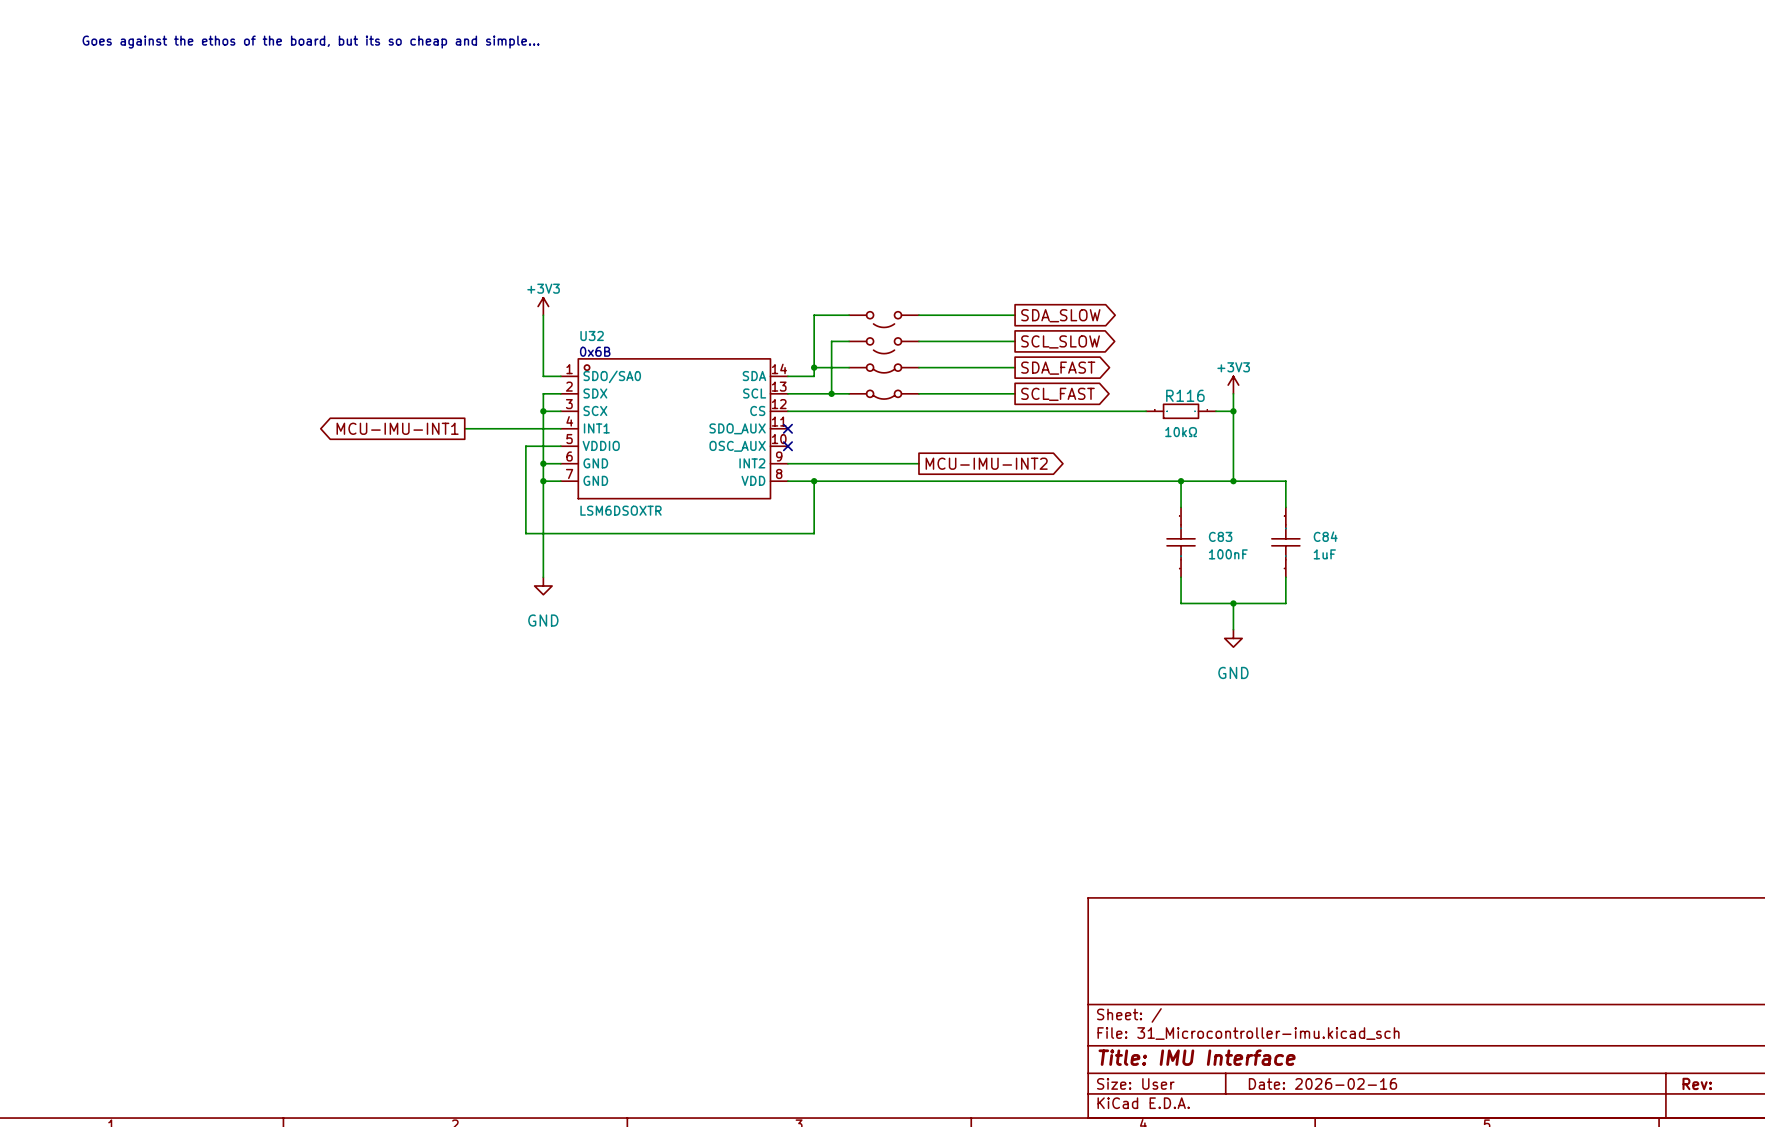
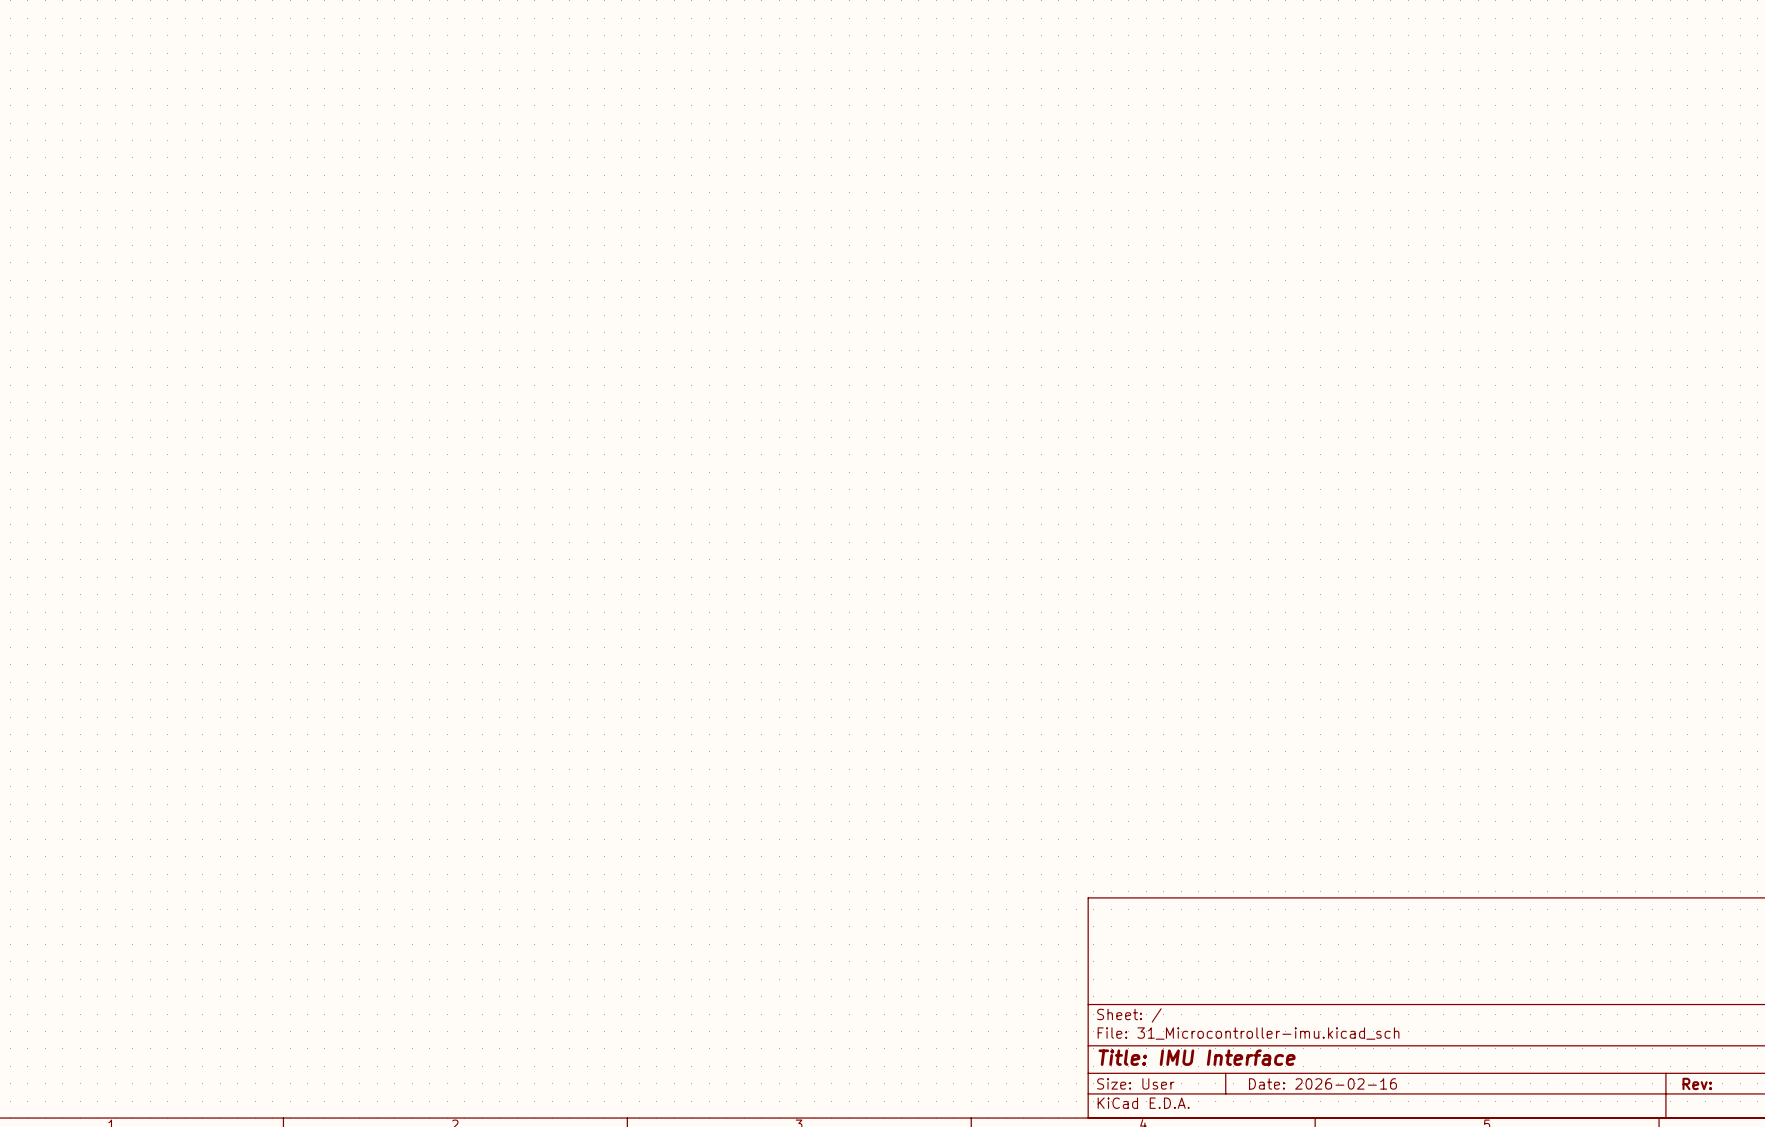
text: Goes against the ethos of the board, but its so cheap and simple... (311, 42) -> none
power symbol: +3V3 (543, 306) -> none
wire: (543, 315) (543, 376) (560, 376) -> none
wire: (849, 315) (814, 315) (814, 376) (787, 376) -> none
wire: (918, 315) (1015, 315) -> none
global label: SDA_SLOW (1060, 315) -> none
part: (884, 319) -> none
wire: (849, 341) (831, 341) (831, 393) -> none
wire: (918, 341) (1015, 341) -> none
global label: SCL_SLOW (1060, 341) -> none
part: (884, 345) -> none
text: 0x6B (595, 351) -> none
wire: (814, 367) (849, 367) -> none
junction: (814, 367) -> none
wire: (918, 367) (1015, 367) -> none
part: (884, 368) -> none
global label: SDA_FAST (1058, 368) -> none
power symbol: +3V3 (1233, 385) -> none
wire: (560, 393) (543, 393) (543, 577) -> none
wire: (787, 393) (849, 393) -> none
junction: (831, 393) -> none
wire: (918, 393) (1015, 393) -> none
wire: (1233, 393) (1233, 481) -> none
part: (884, 394) -> none
global label: SCL_FAST (1057, 394) -> none
wire: (543, 411) (560, 411) -> none
junction: (543, 411) -> none
wire: (787, 411) (1146, 411) -> none
R116: 10kΩ (1181, 411) -> none
wire: (1215, 411) (1233, 411) -> none
junction: (1233, 411) -> none
global label: MCU-IMU-INT1 (397, 428) -> none
wire: (464, 428) (560, 428) -> none
U32: LSM6DSOXTR (674, 428) -> none
no-connect mark: (787, 428) -> none
wire: (560, 446) (525, 446) (525, 533) (814, 533) (814, 481) -> none
no-connect mark: (787, 446) -> none
wire: (543, 463) (560, 463) -> none
junction: (543, 463) -> none
wire: (787, 463) (918, 463) -> none
global label: MCU-IMU-INT2 (986, 463) -> none
wire: (543, 481) (560, 481) -> none
junction: (543, 481) -> none
wire: (787, 481) (1285, 481) (1285, 507) -> none
junction: (814, 481) -> none
wire: (1181, 481) (1181, 507) -> none
junction: (1181, 481) -> none
junction: (1233, 481) -> none
C83: 100nF (1181, 542) -> none
C84: 1uF (1285, 542) -> none
wire: (1181, 577) (1181, 603) (1285, 603) (1285, 577) -> none
power symbol: GND (543, 586) -> none
wire: (1233, 603) (1233, 629) -> none
junction: (1233, 603) -> none
power symbol: GND (1233, 638) -> none

